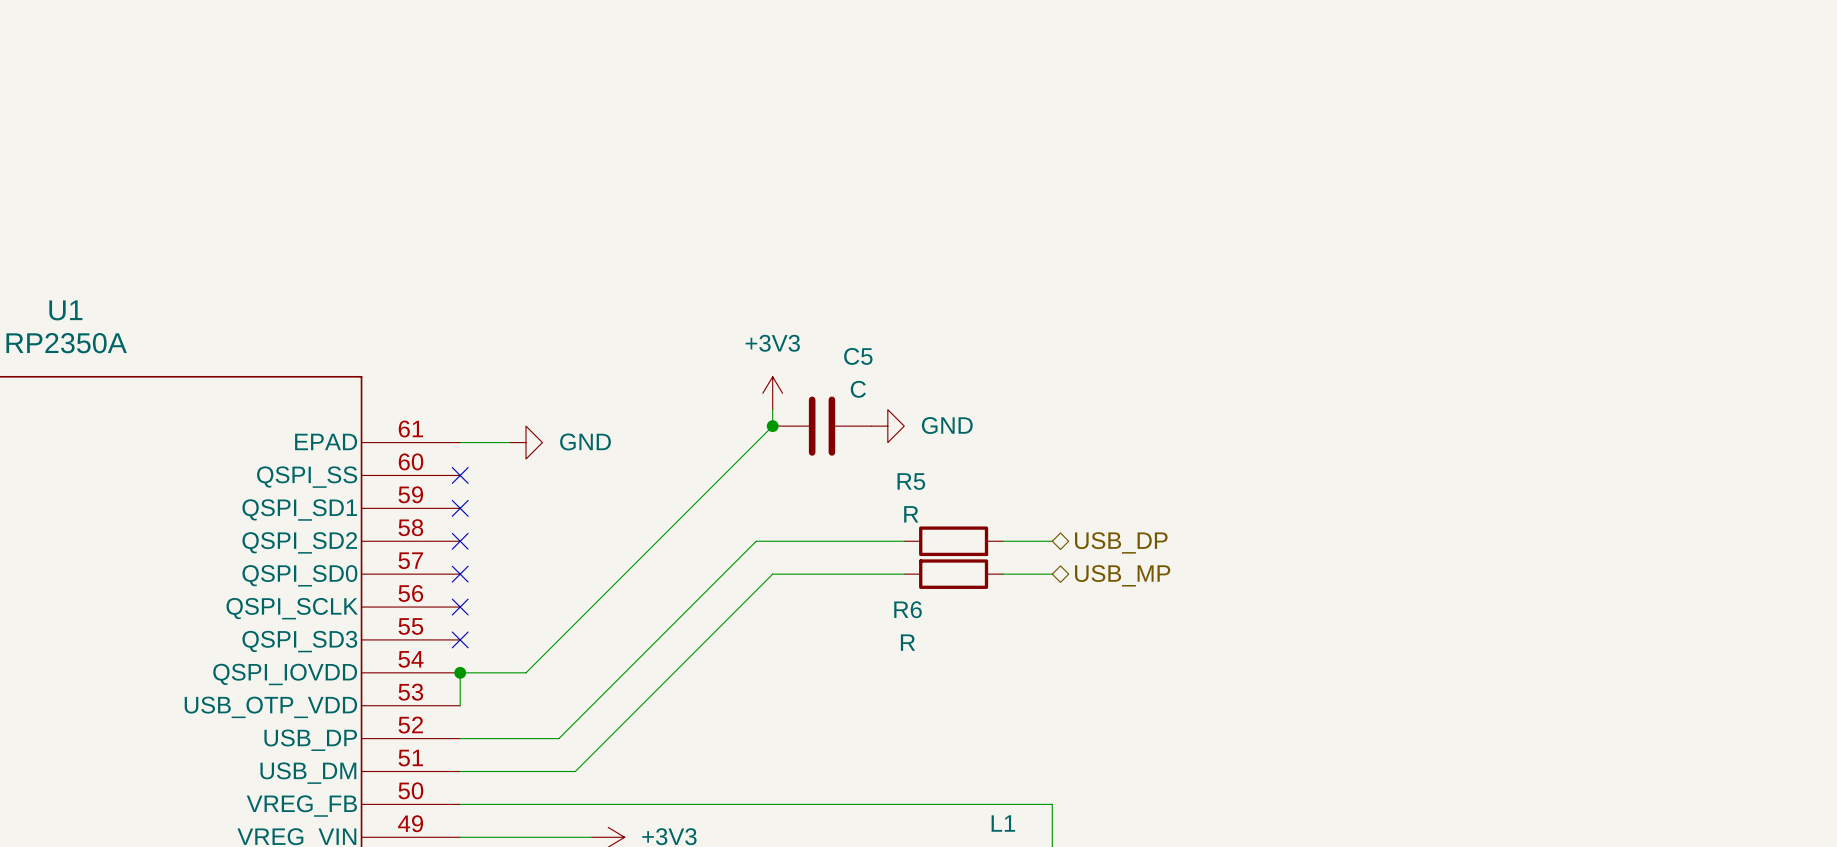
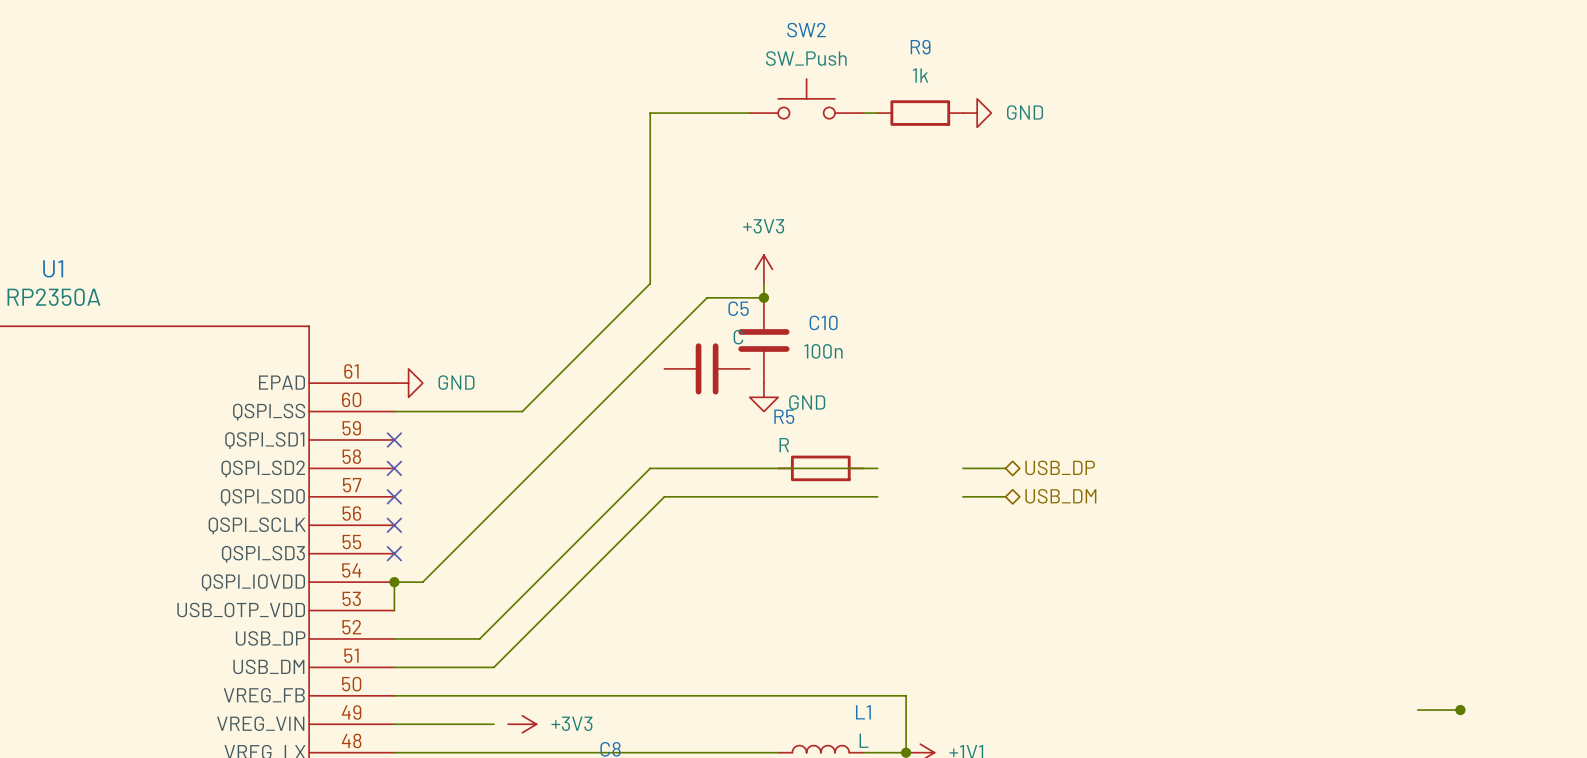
SW2: none -> SW_Push (806, 98)
wire: none -> (749, 113) (650, 113) (650, 283) (522, 411) (394, 411)
wire: none -> (863, 113) (877, 113)
R9: none -> 1k (920, 113)
power symbol: none -> GND (977, 113)
junction: none -> (763, 297)
power symbol position: +3V3 (772, 393) -> +3V3 (763, 269)
C10: none -> 100n (763, 340)
wire: (772, 409) (772, 426) (526, 672) (493, 672) -> (763, 283) (763, 297) (707, 297) (422, 582)
junction: (772, 426) -> none
power symbol rotation: 0° (887, 426) -> 90° clockwise (763, 397)
power symbol position: GND (887, 426) -> GND (763, 397)
wire: (460, 442) (509, 442) -> none
power symbol position: GND (526, 442) -> GND (408, 383)
no-connect mark: (460, 475) -> none
wire: none -> (778, 468) (863, 468)
wire: (1019, 541) (1052, 541) -> none
wire: none -> (962, 468) (1005, 468)
hierarchical label position: USB_DP (1121, 542) -> USB_DP (1060, 467)
wire: none -> (778, 496) (863, 496)
R6: R (953, 574) -> none
wire: (1019, 574) (1052, 574) -> none
wire: none -> (962, 496) (1005, 496)
hierarchical label: USB_MP (1122, 575) -> none
hierarchical label: none -> USB_DM (1060, 496)
wire: none -> (1417, 710) (1460, 710)
junction: none -> (1460, 710)
wire: (575, 837) (591, 837) -> none

